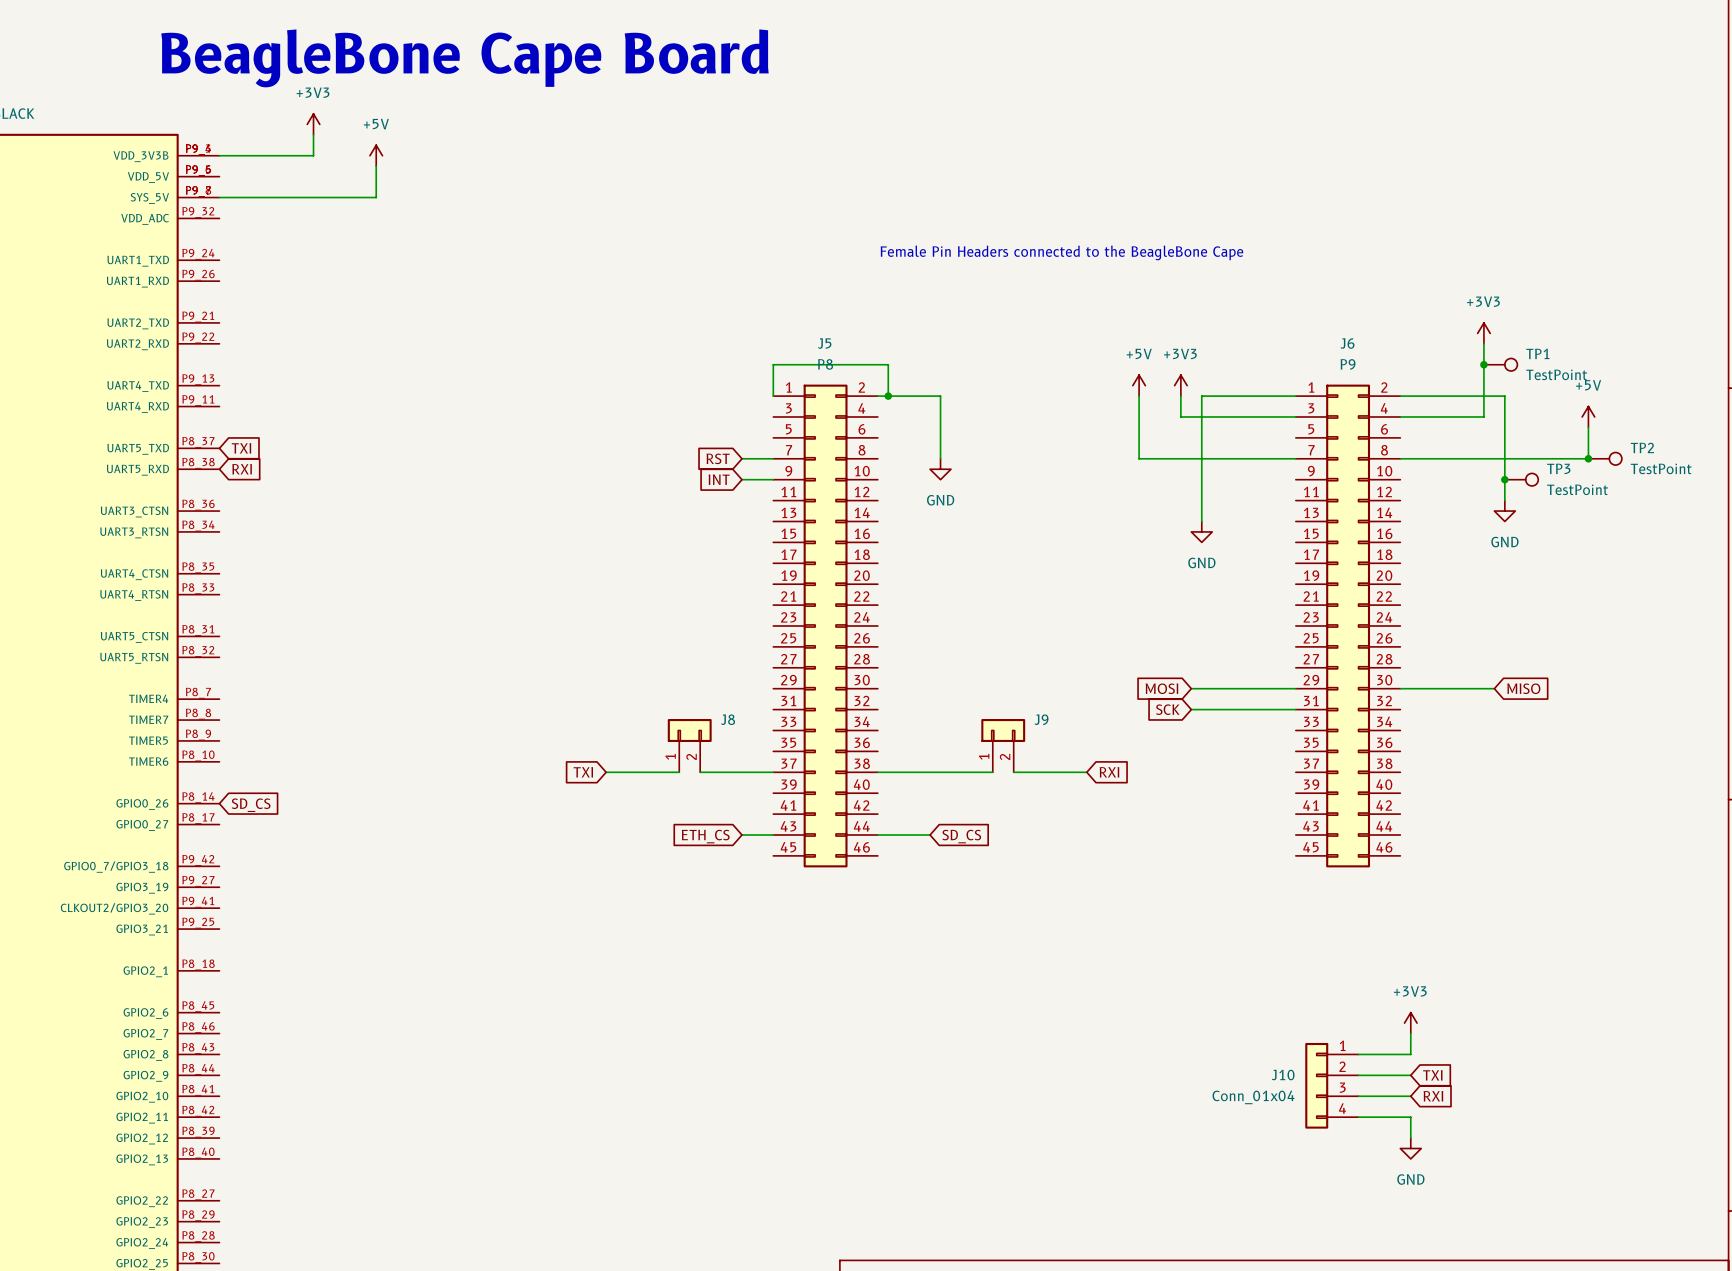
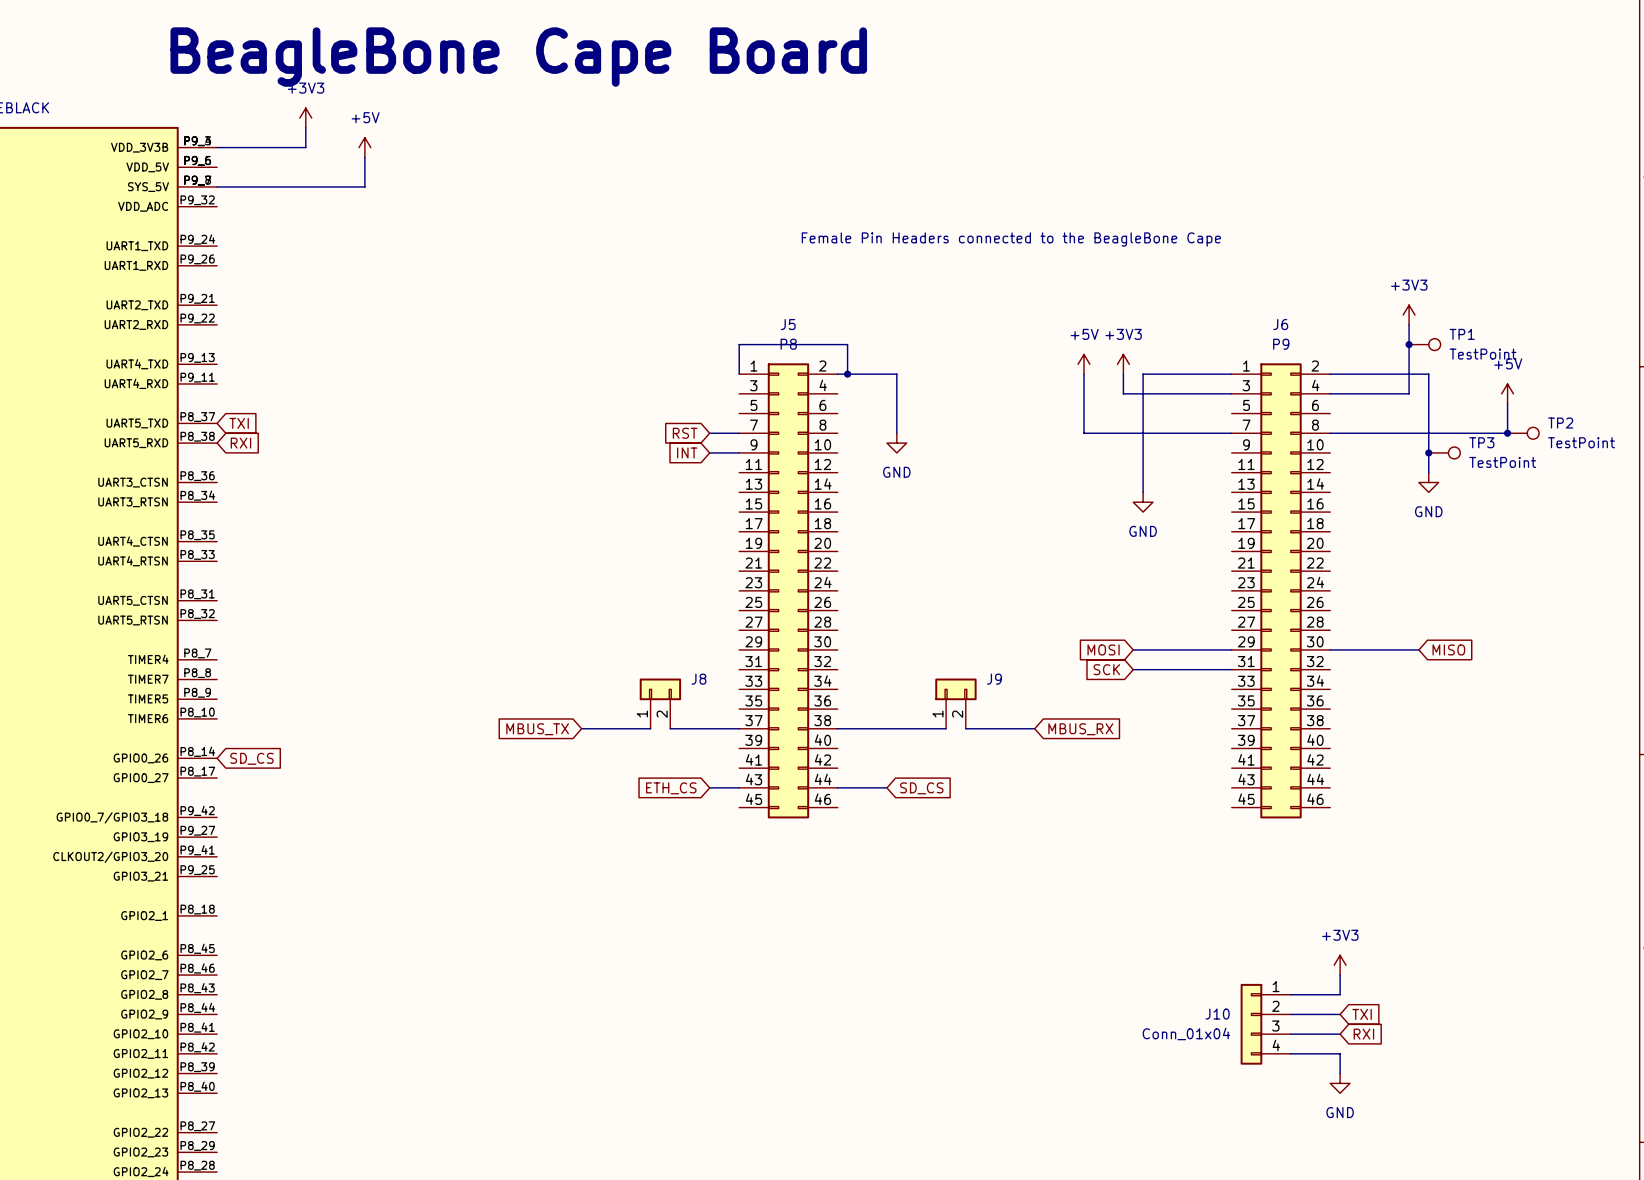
global label: TXI (583, 772) -> MBUS_TX (537, 729)
global label: RXI (1109, 772) -> MBUS_RX (1080, 729)

